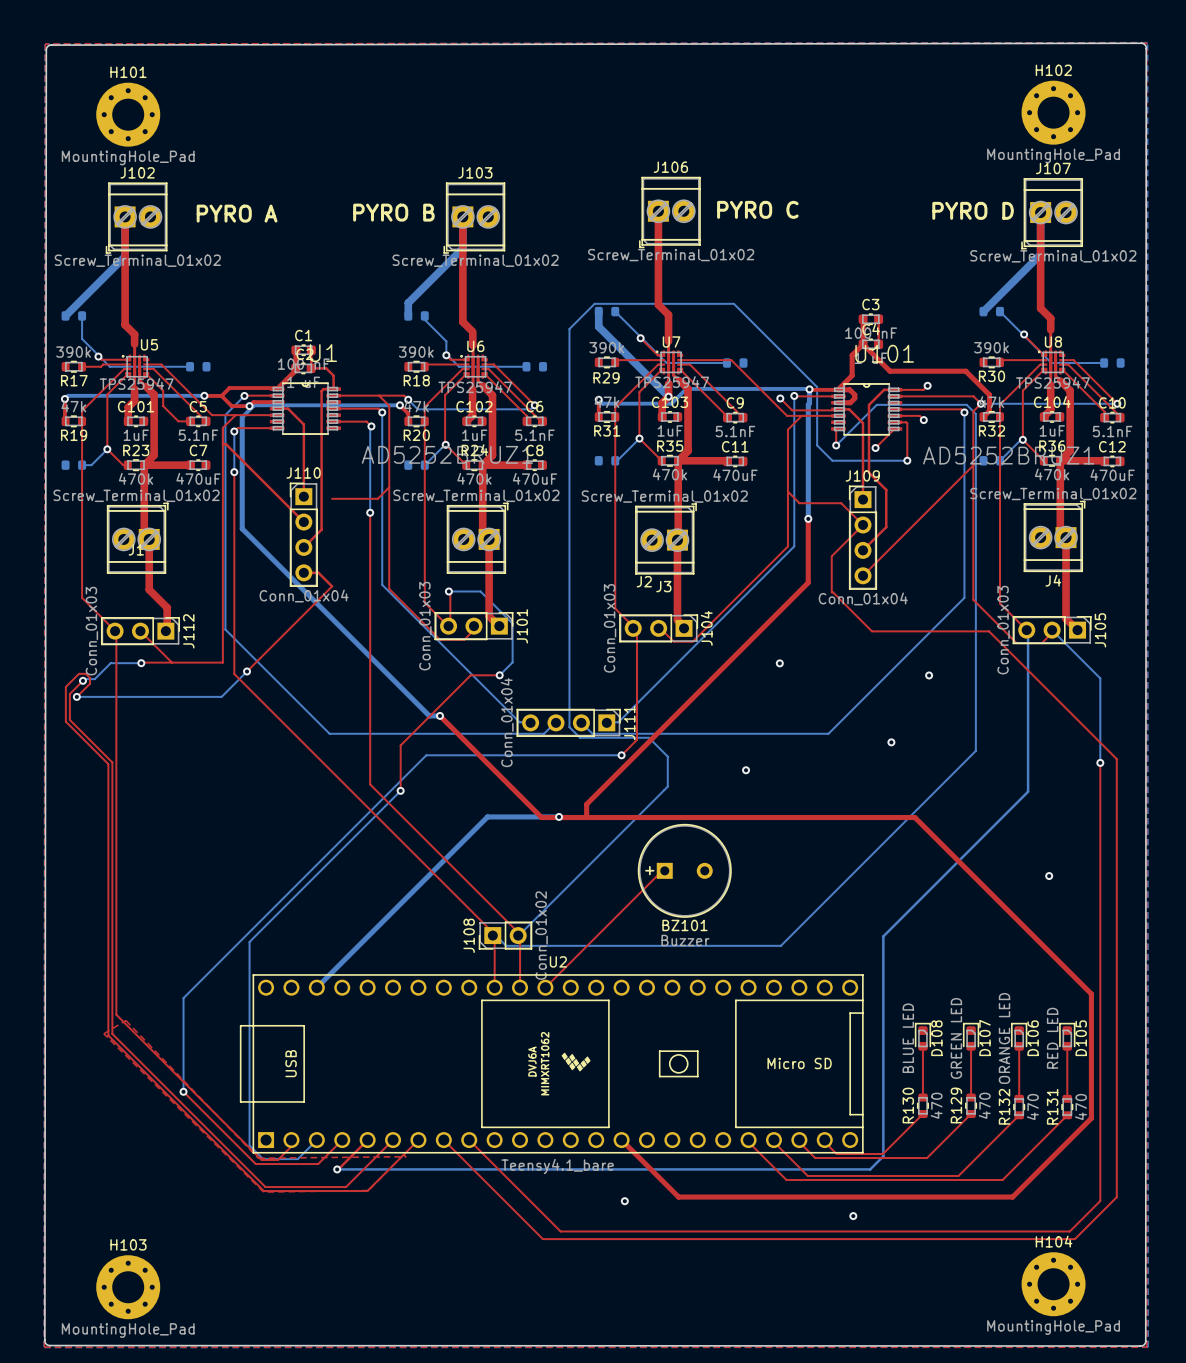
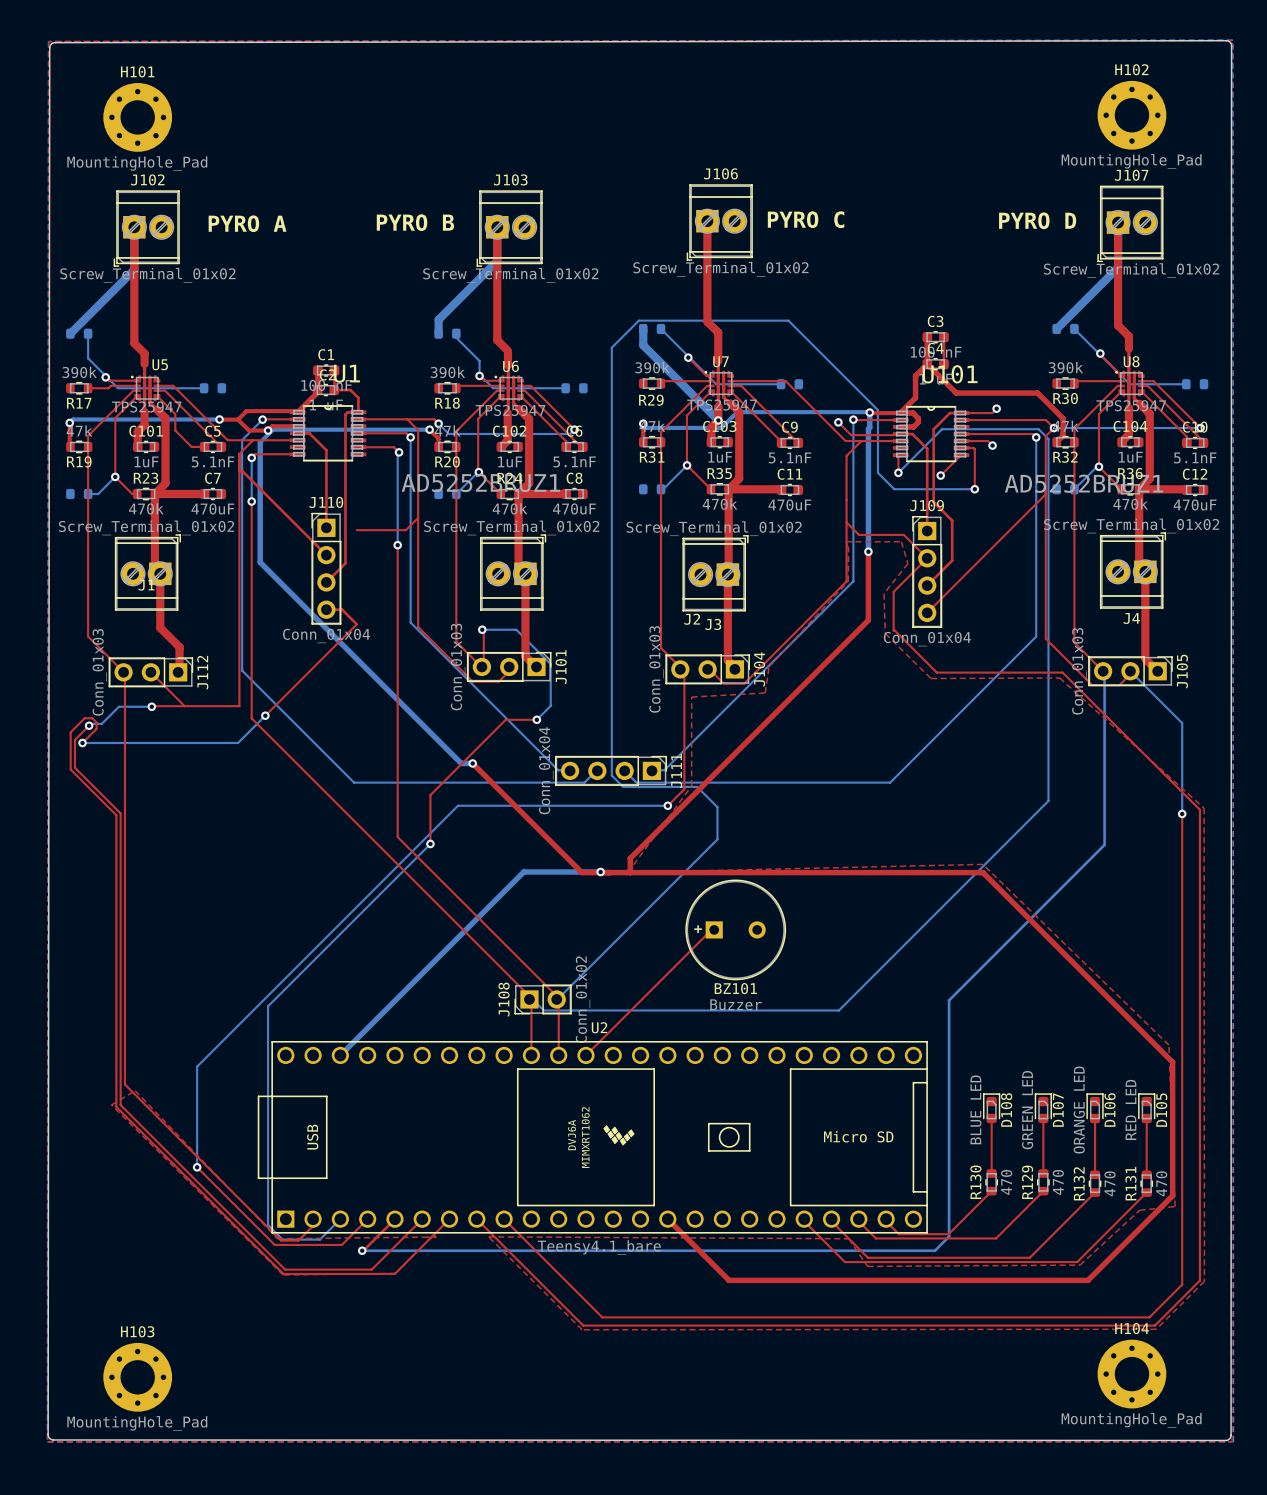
top zone outline: none -> (845, 541) (901, 541) (907, 563) (883, 593) (885, 633) (930, 678) (1059, 677) (1204, 808) (1204, 1281) (1156, 1329) (582, 1329) (488, 1236) (848, 1238) (867, 1266) (1080, 1265) (1139, 1210) (1175, 1206) (1168, 1045) (982, 864) (628, 872) (691, 785) (691, 697) (765, 693) (769, 666) (848, 581) (848, 548) (845, 541)
via: (779, 663) -> none
via: (929, 675) -> none
via: (891, 742) -> none
via: (746, 770) -> none
via: (1049, 876) -> none
via: (624, 1201) -> none
via: (853, 1216) -> none

